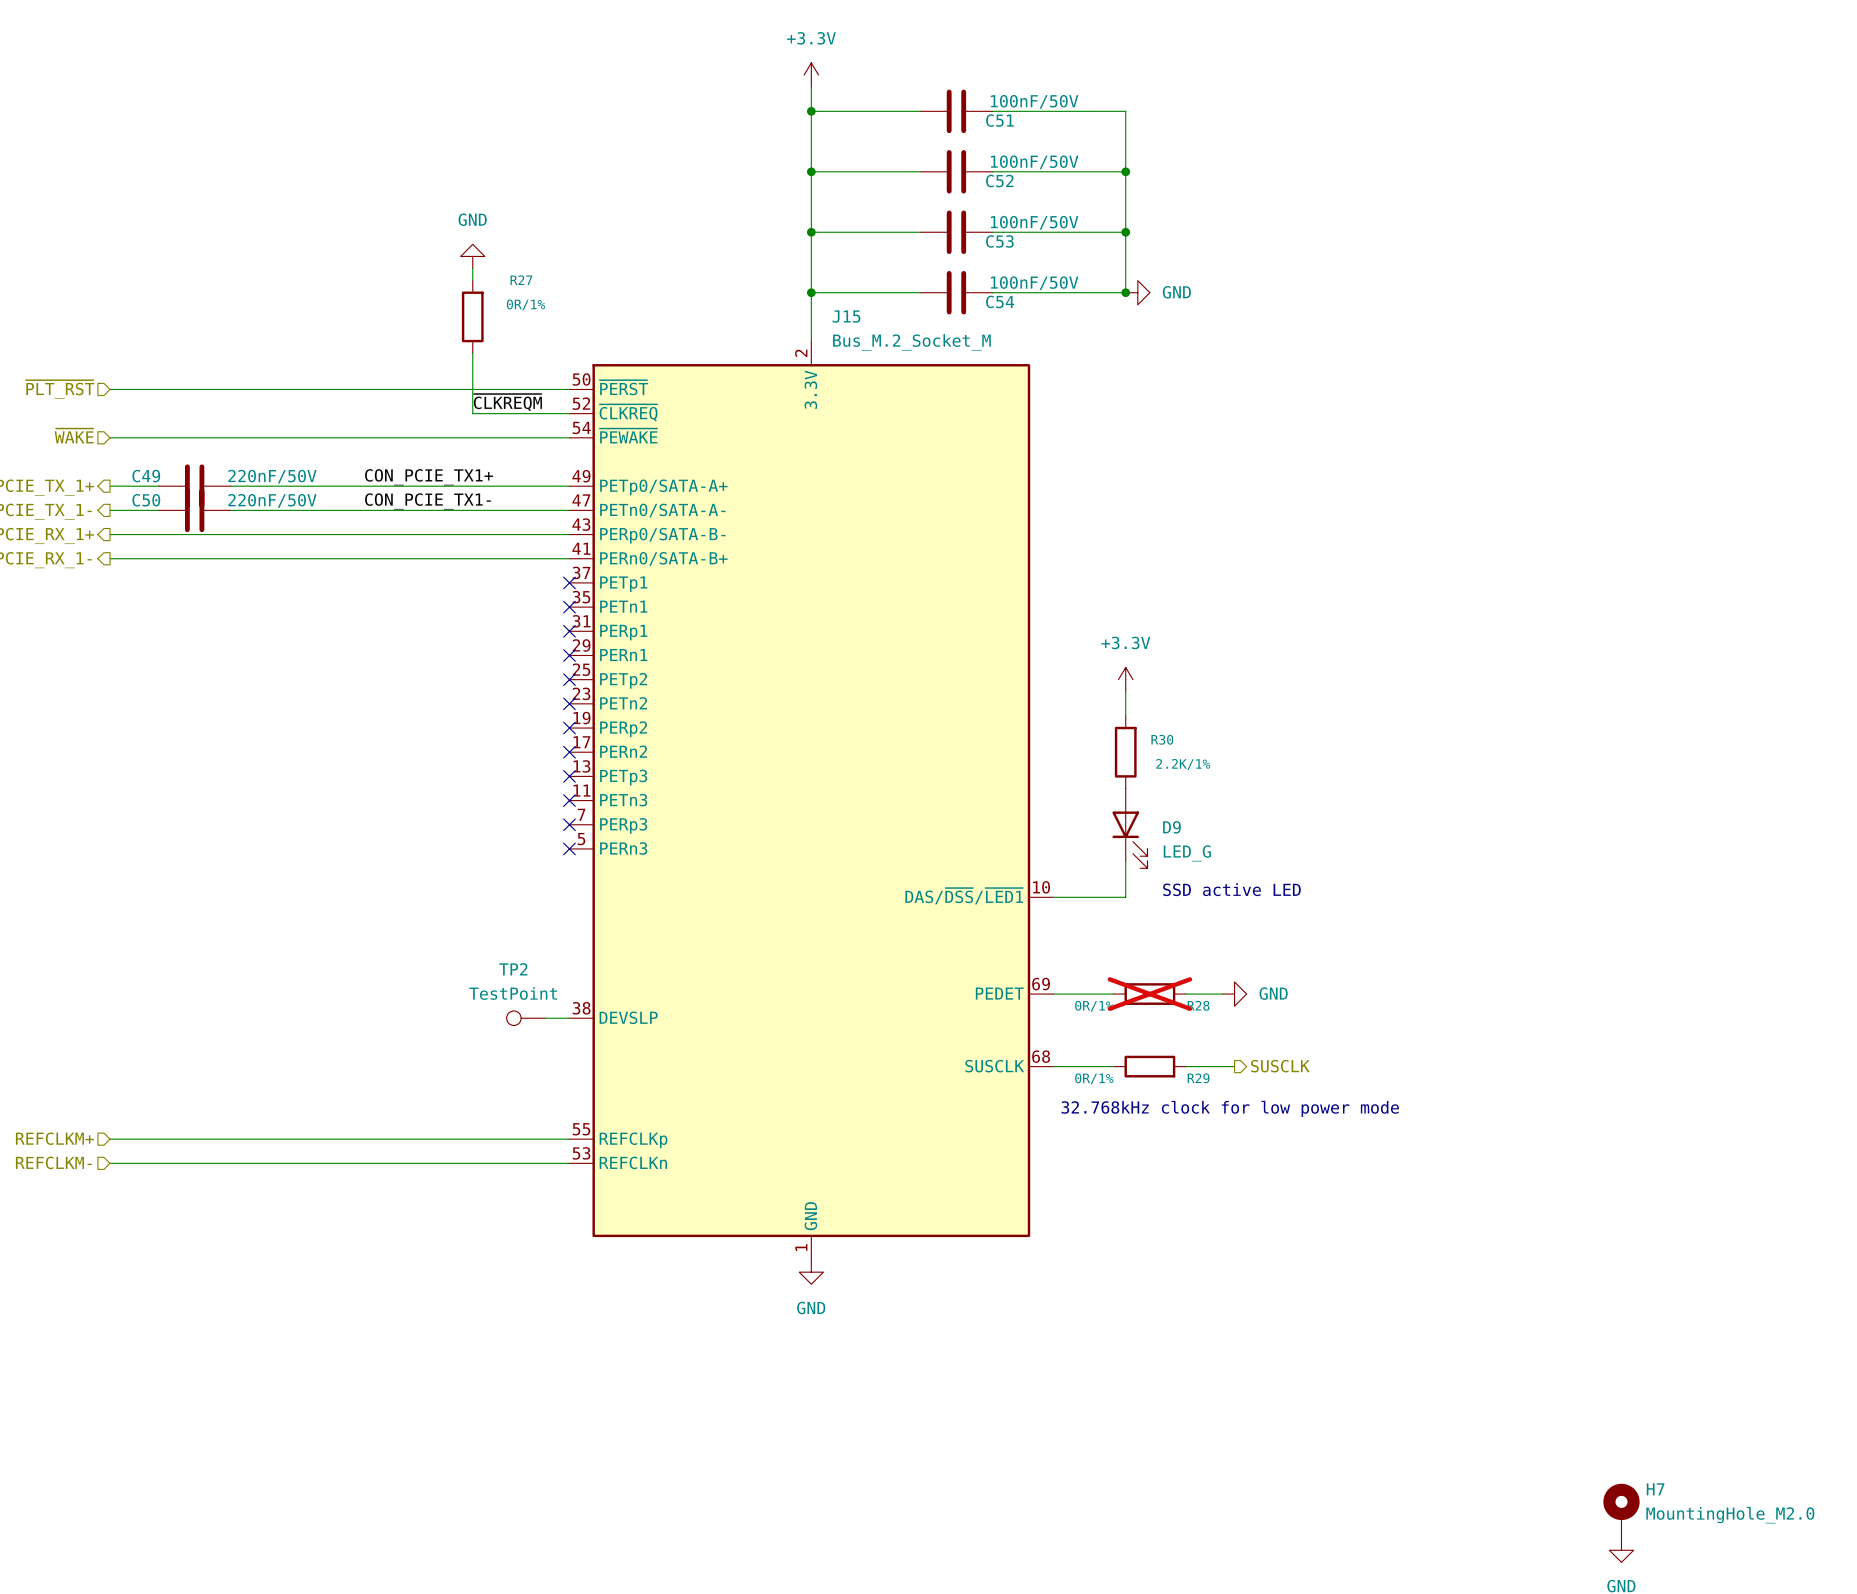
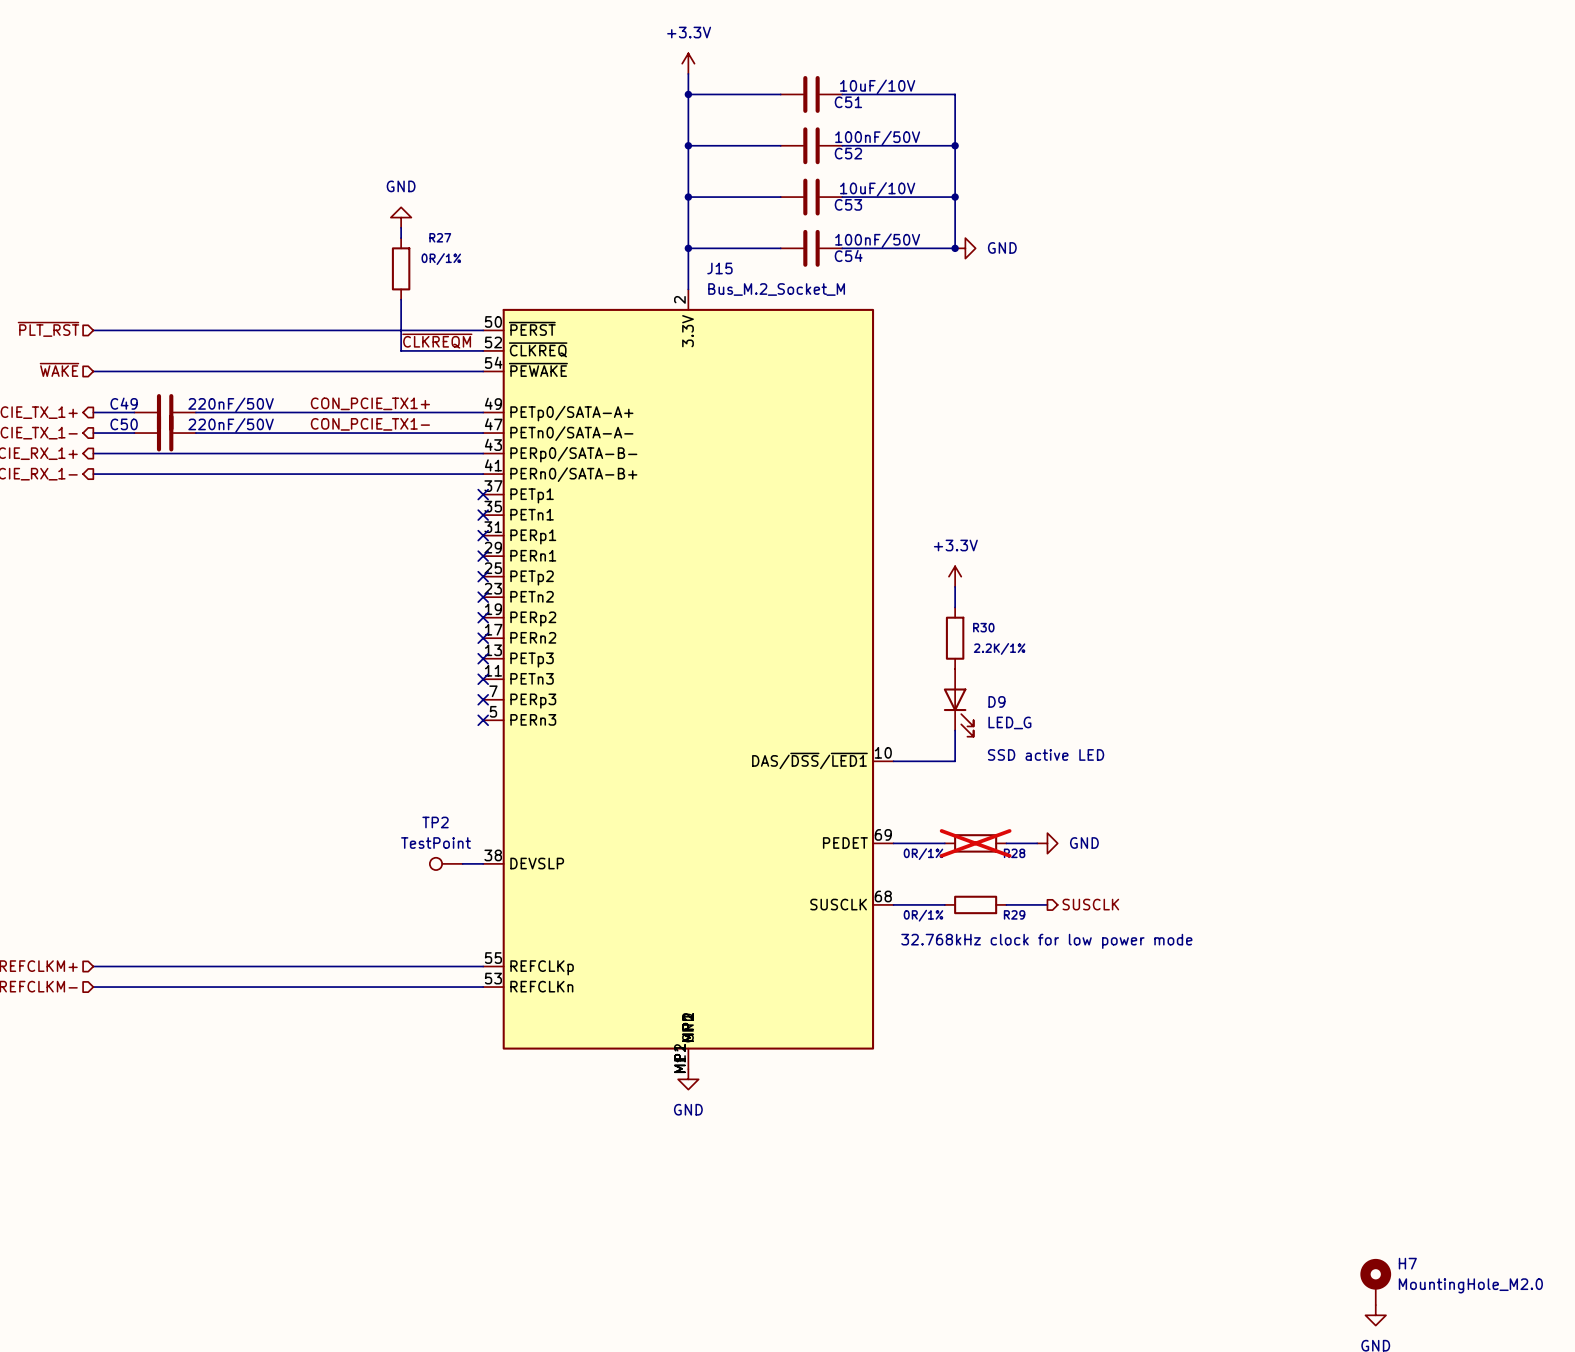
C51 value: 100nF/50V (1034, 101) -> 10uF/10V (877, 86)
C53 value: 100nF/50V (1034, 222) -> 10uF/10V (877, 189)
J15 symbol: [569, 341, 1054, 1261] -> [483, 289, 894, 1070]

